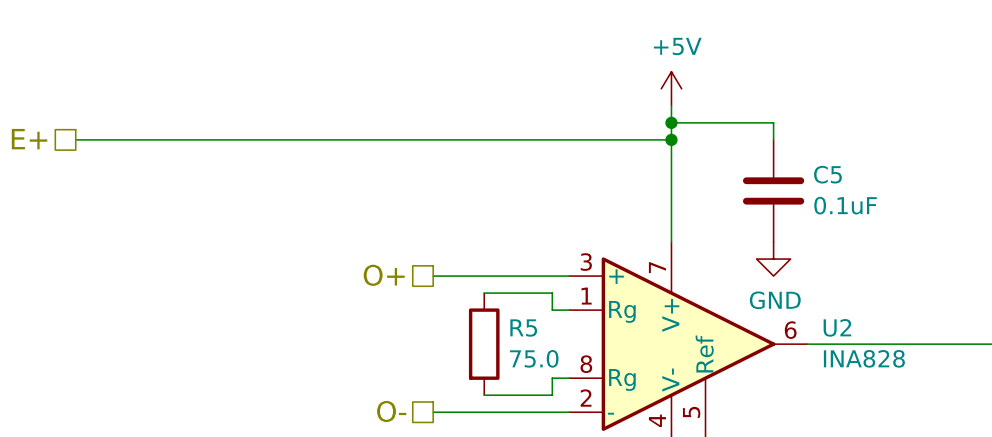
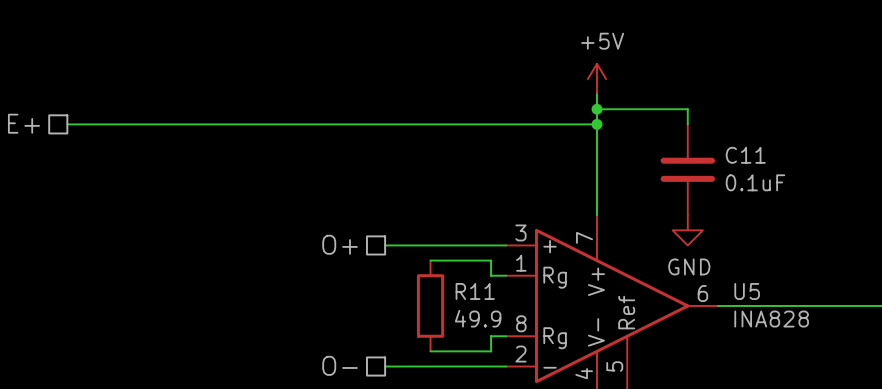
C5 name: C5 (827, 174) -> C11 (745, 155)
U2 name: U2 (837, 327) -> U5 (747, 291)
R5 name: R5 (523, 328) -> R11 (475, 291)
R5 value: 75.0 (534, 358) -> 49.9 (478, 318)

